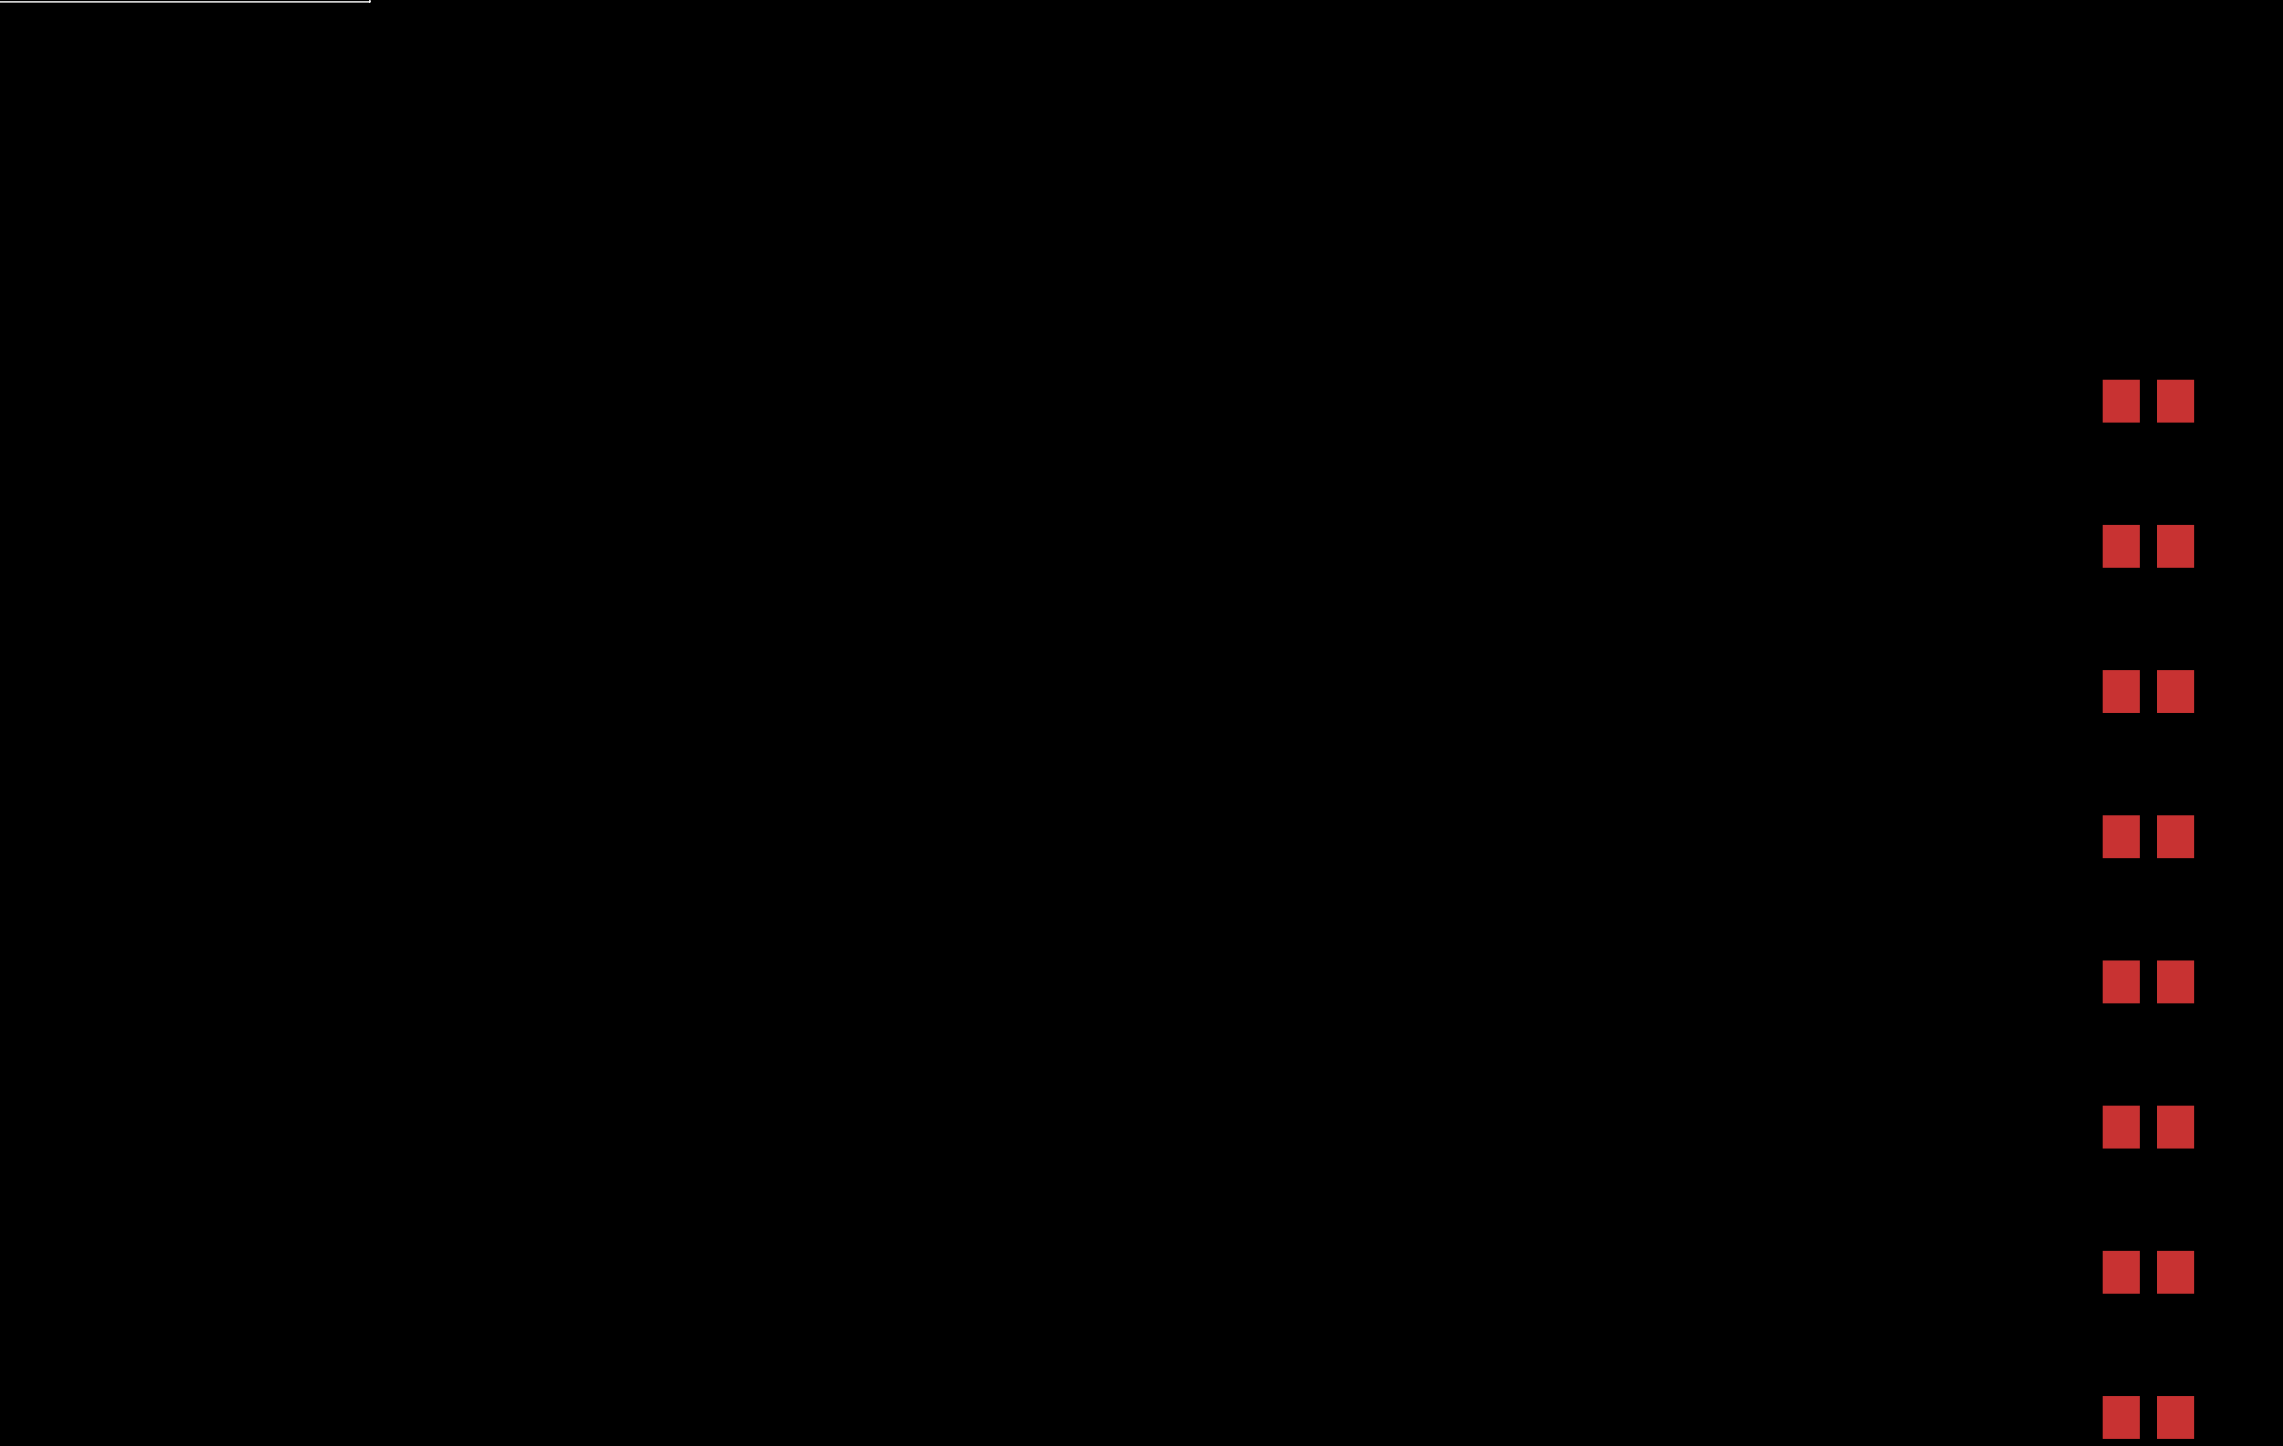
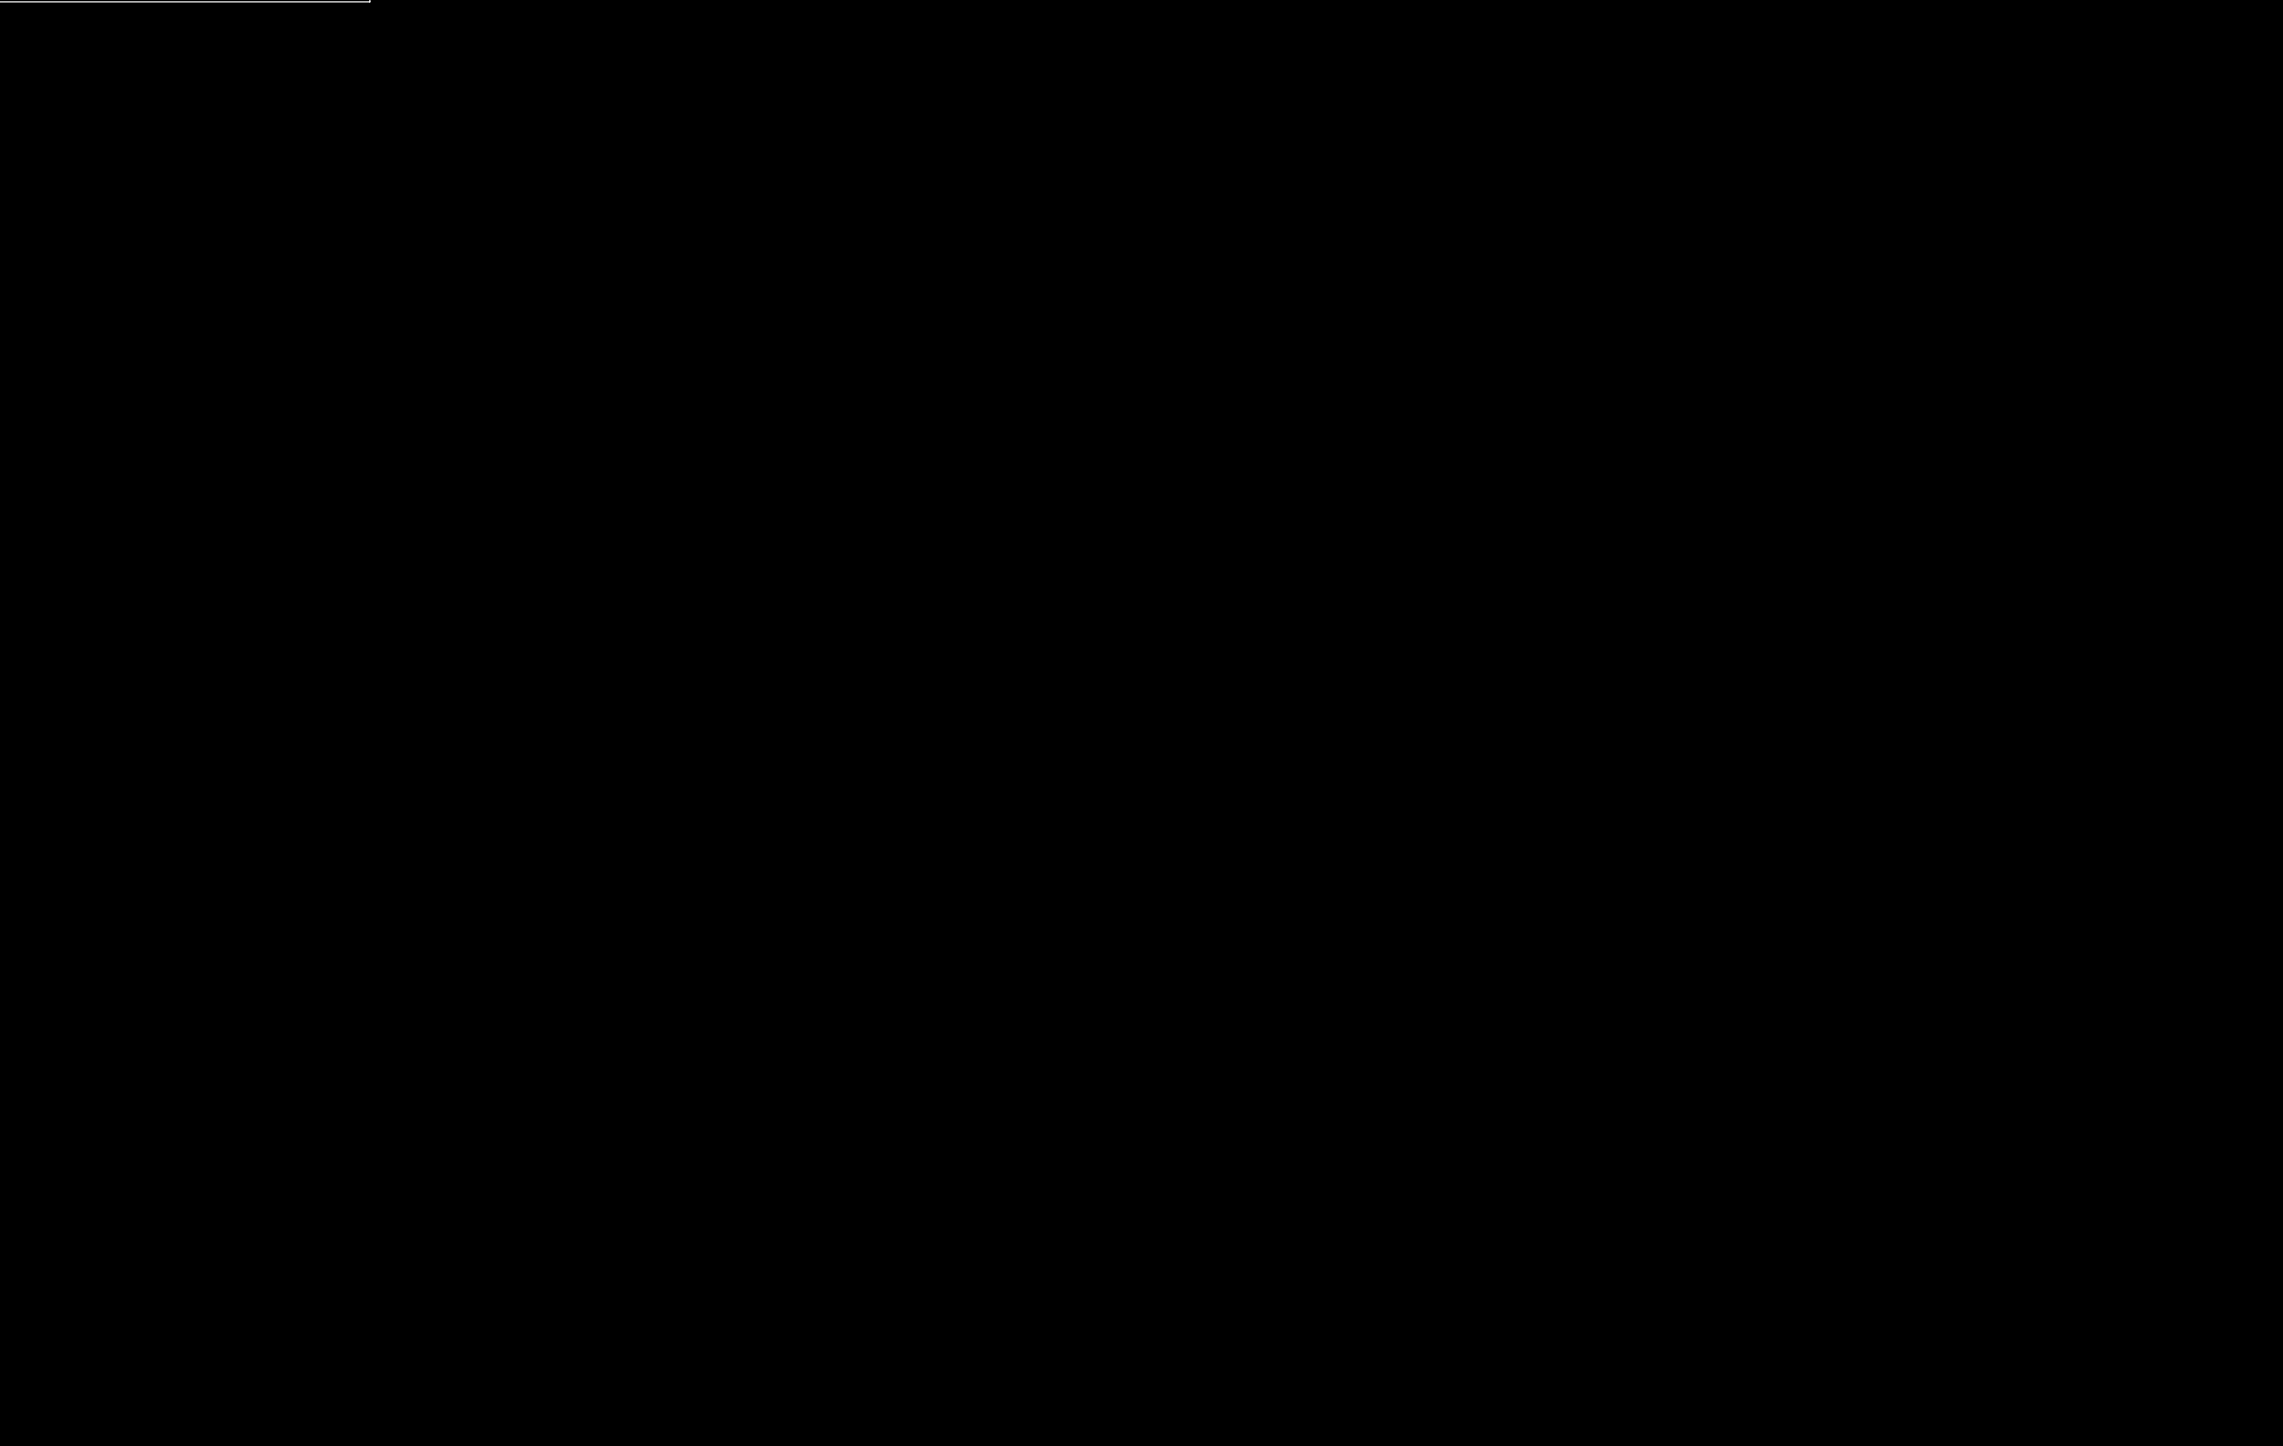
part: (2148, 401) -> none
part: (2148, 546) -> none
part: (2148, 691) -> none
part: (2148, 836) -> none
part: (2148, 981) -> none
part: (2148, 1127) -> none
part: (2148, 1272) -> none
part: (2148, 1417) -> none

